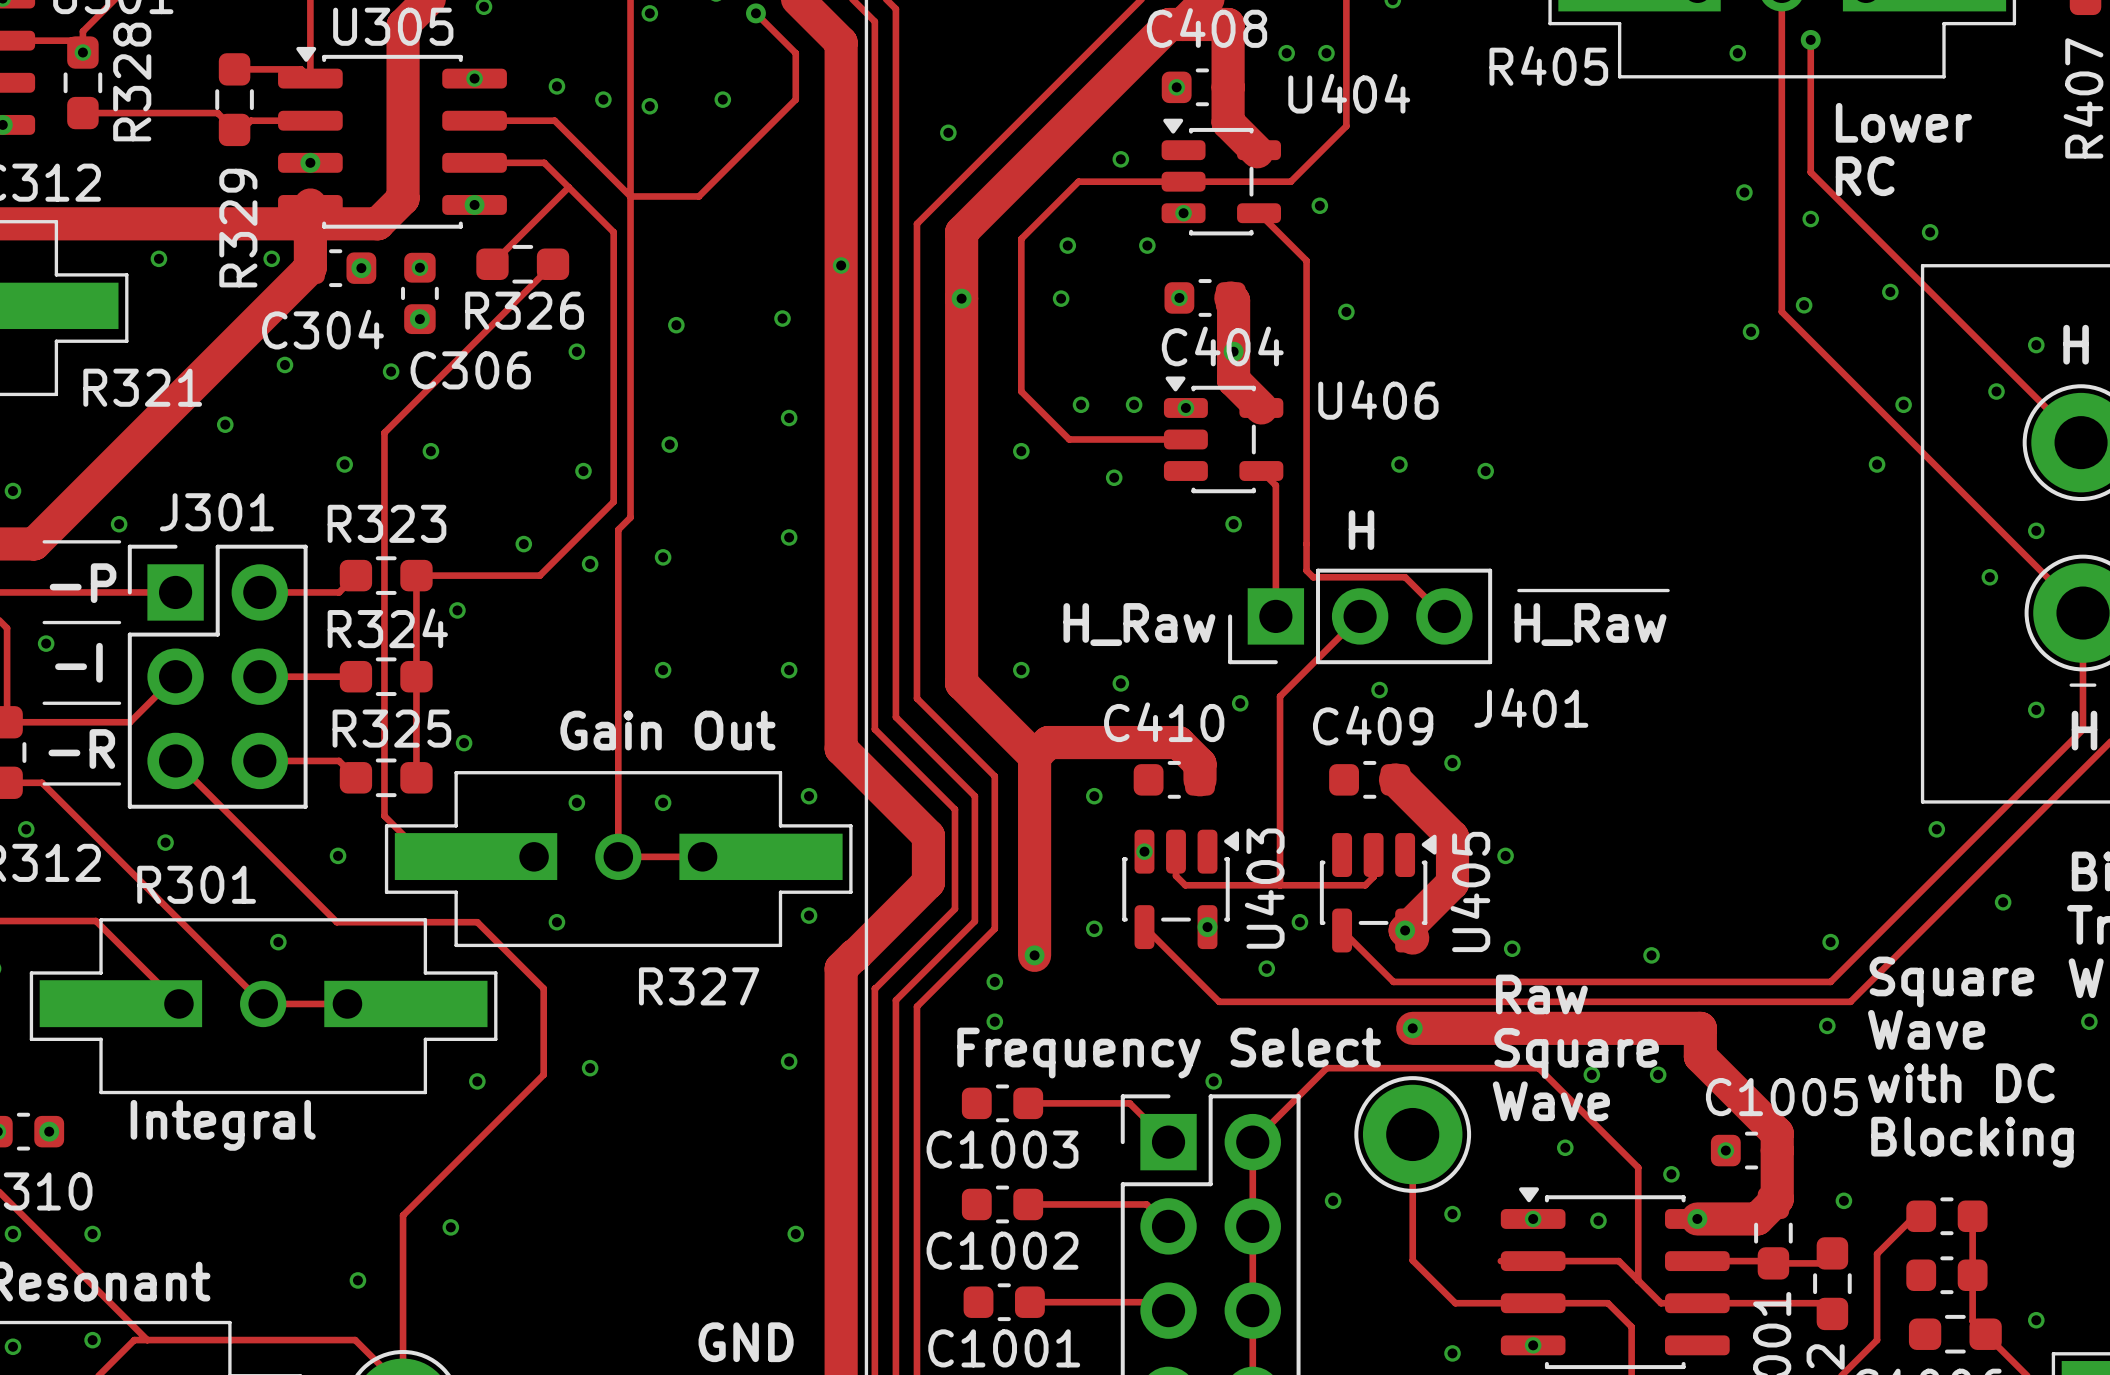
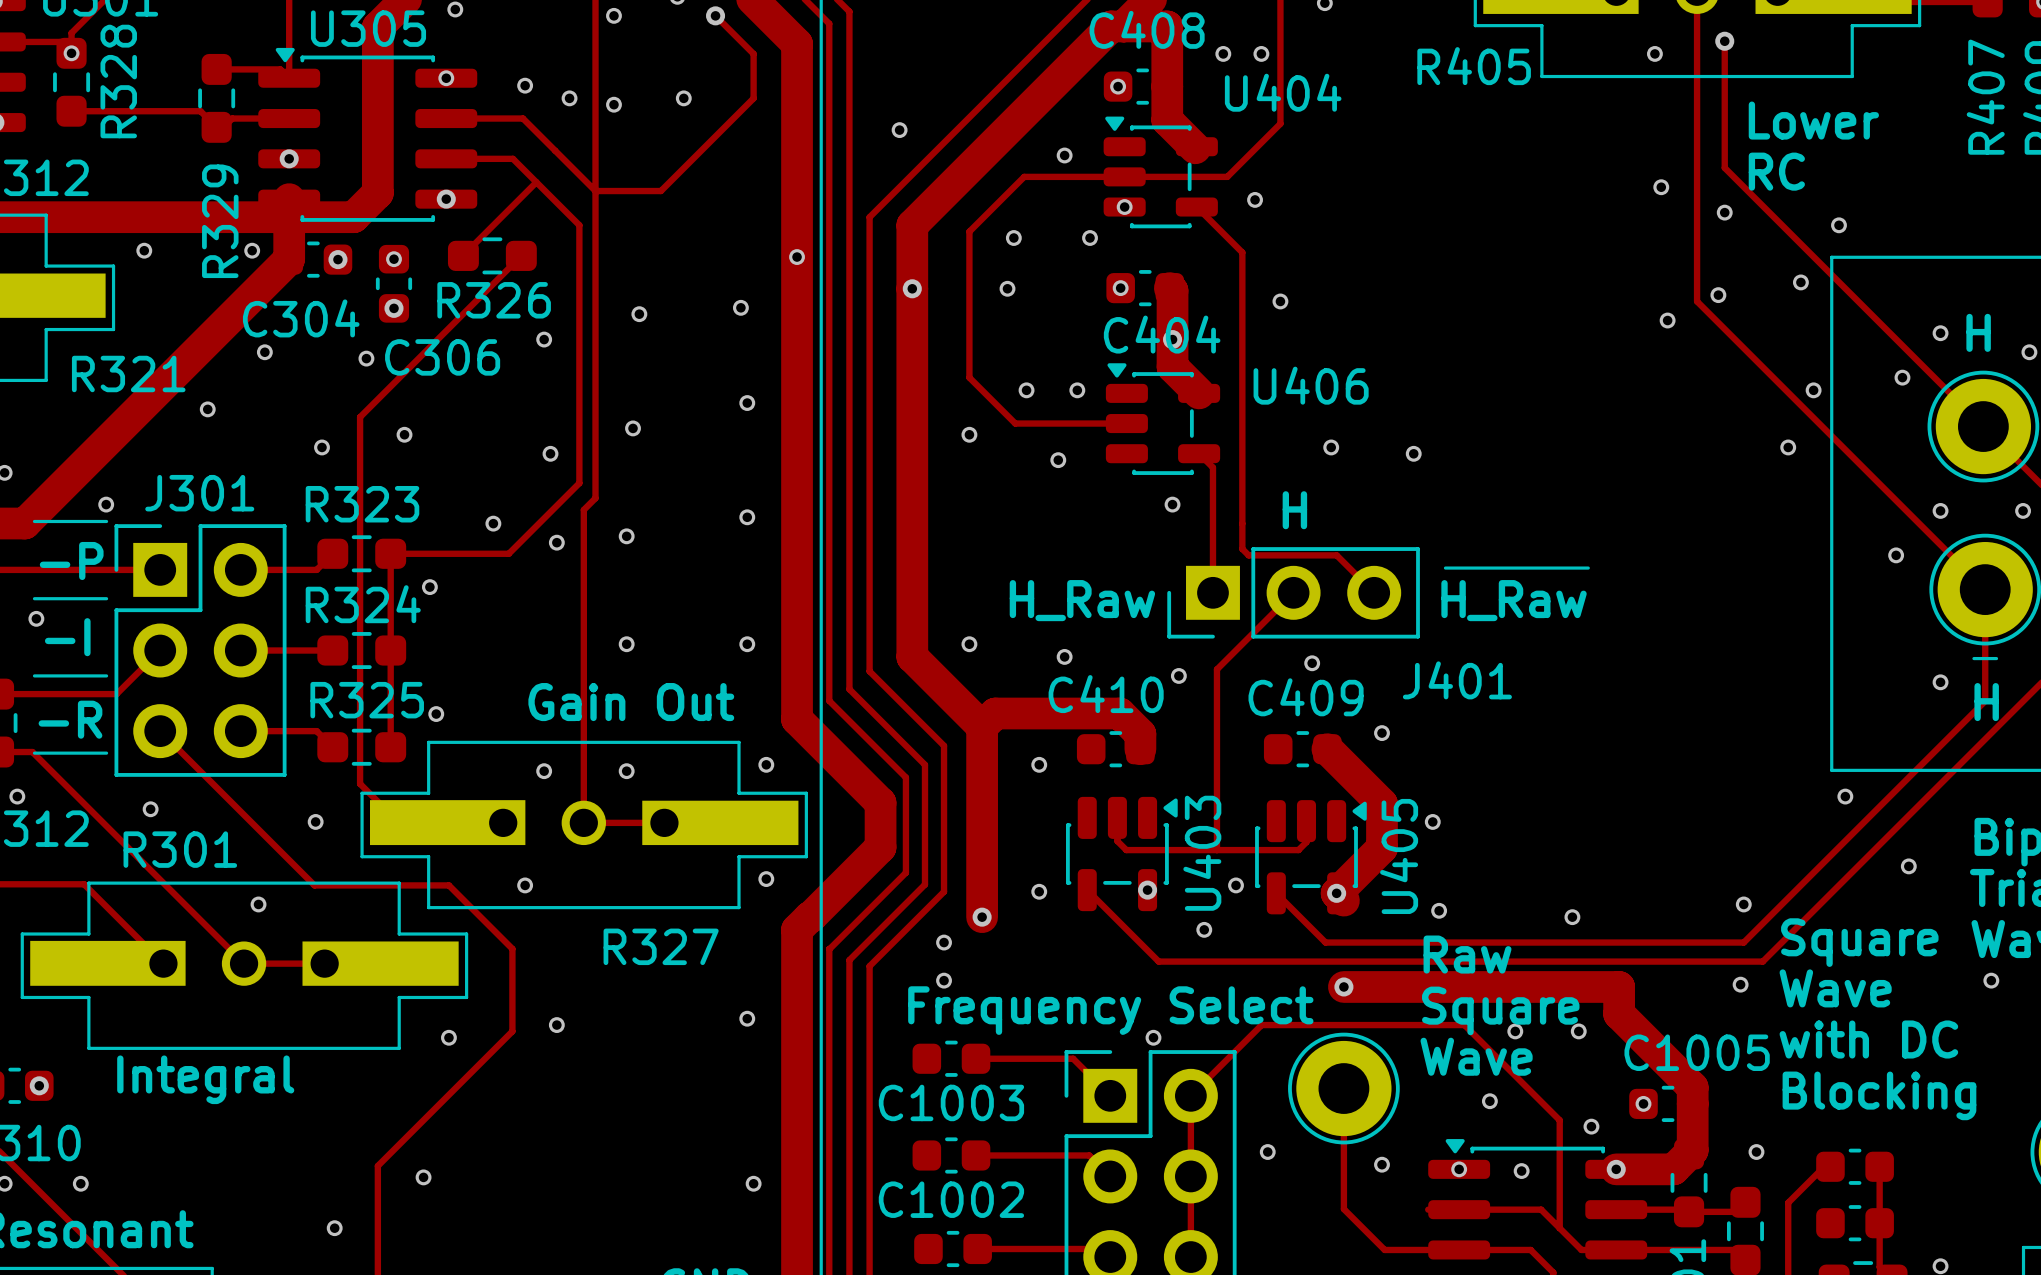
via: (1185, 407) -> none
via: (1144, 851) -> none

